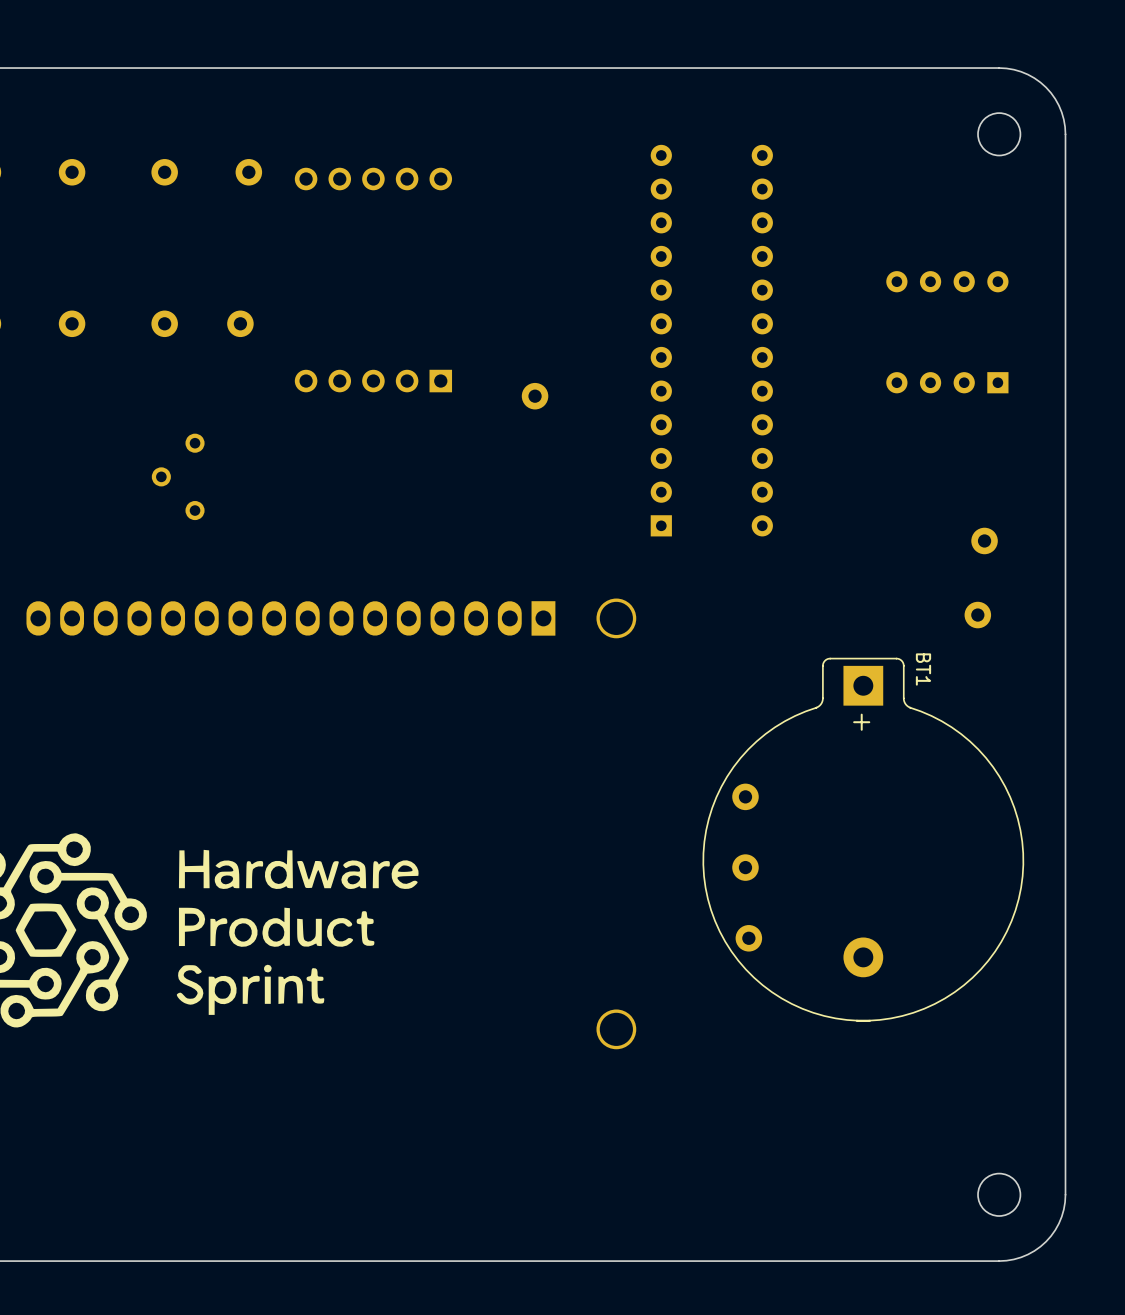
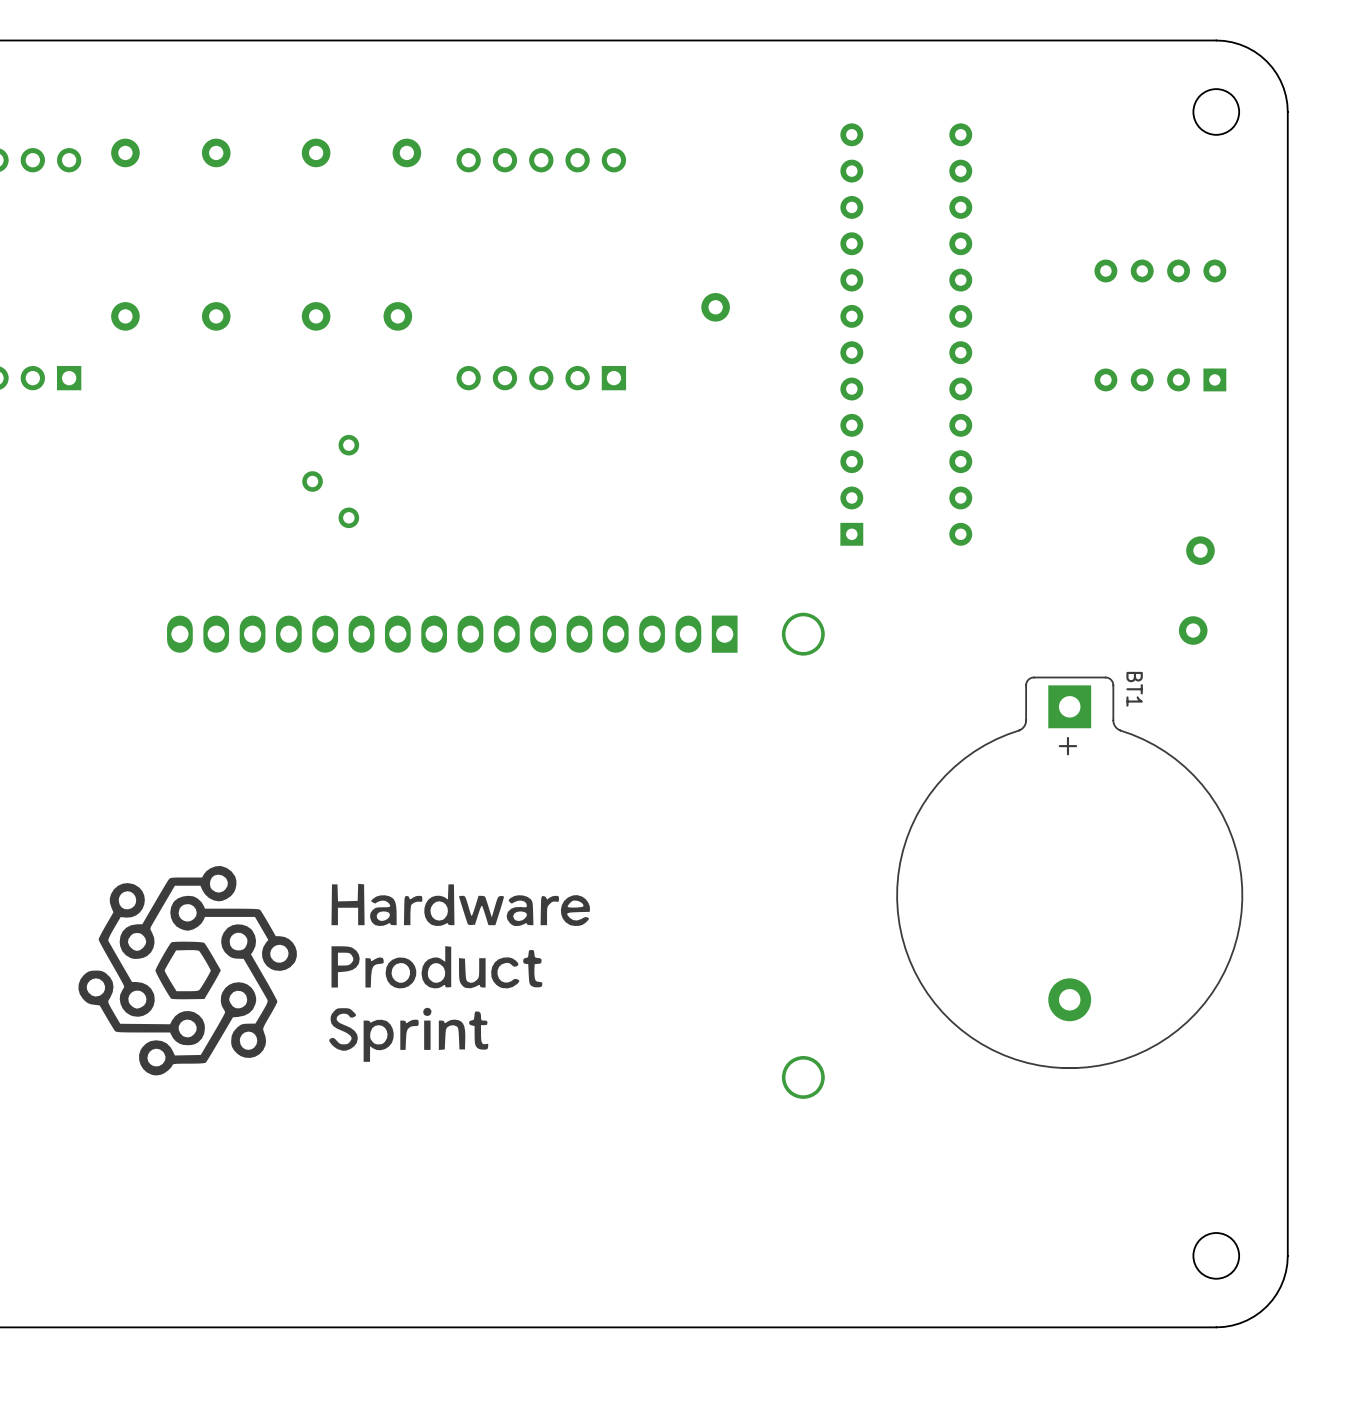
part position: (535, 396) -> (715, 307)
part: (745, 796) -> none
part: (745, 867) -> none
part: (748, 938) -> none

